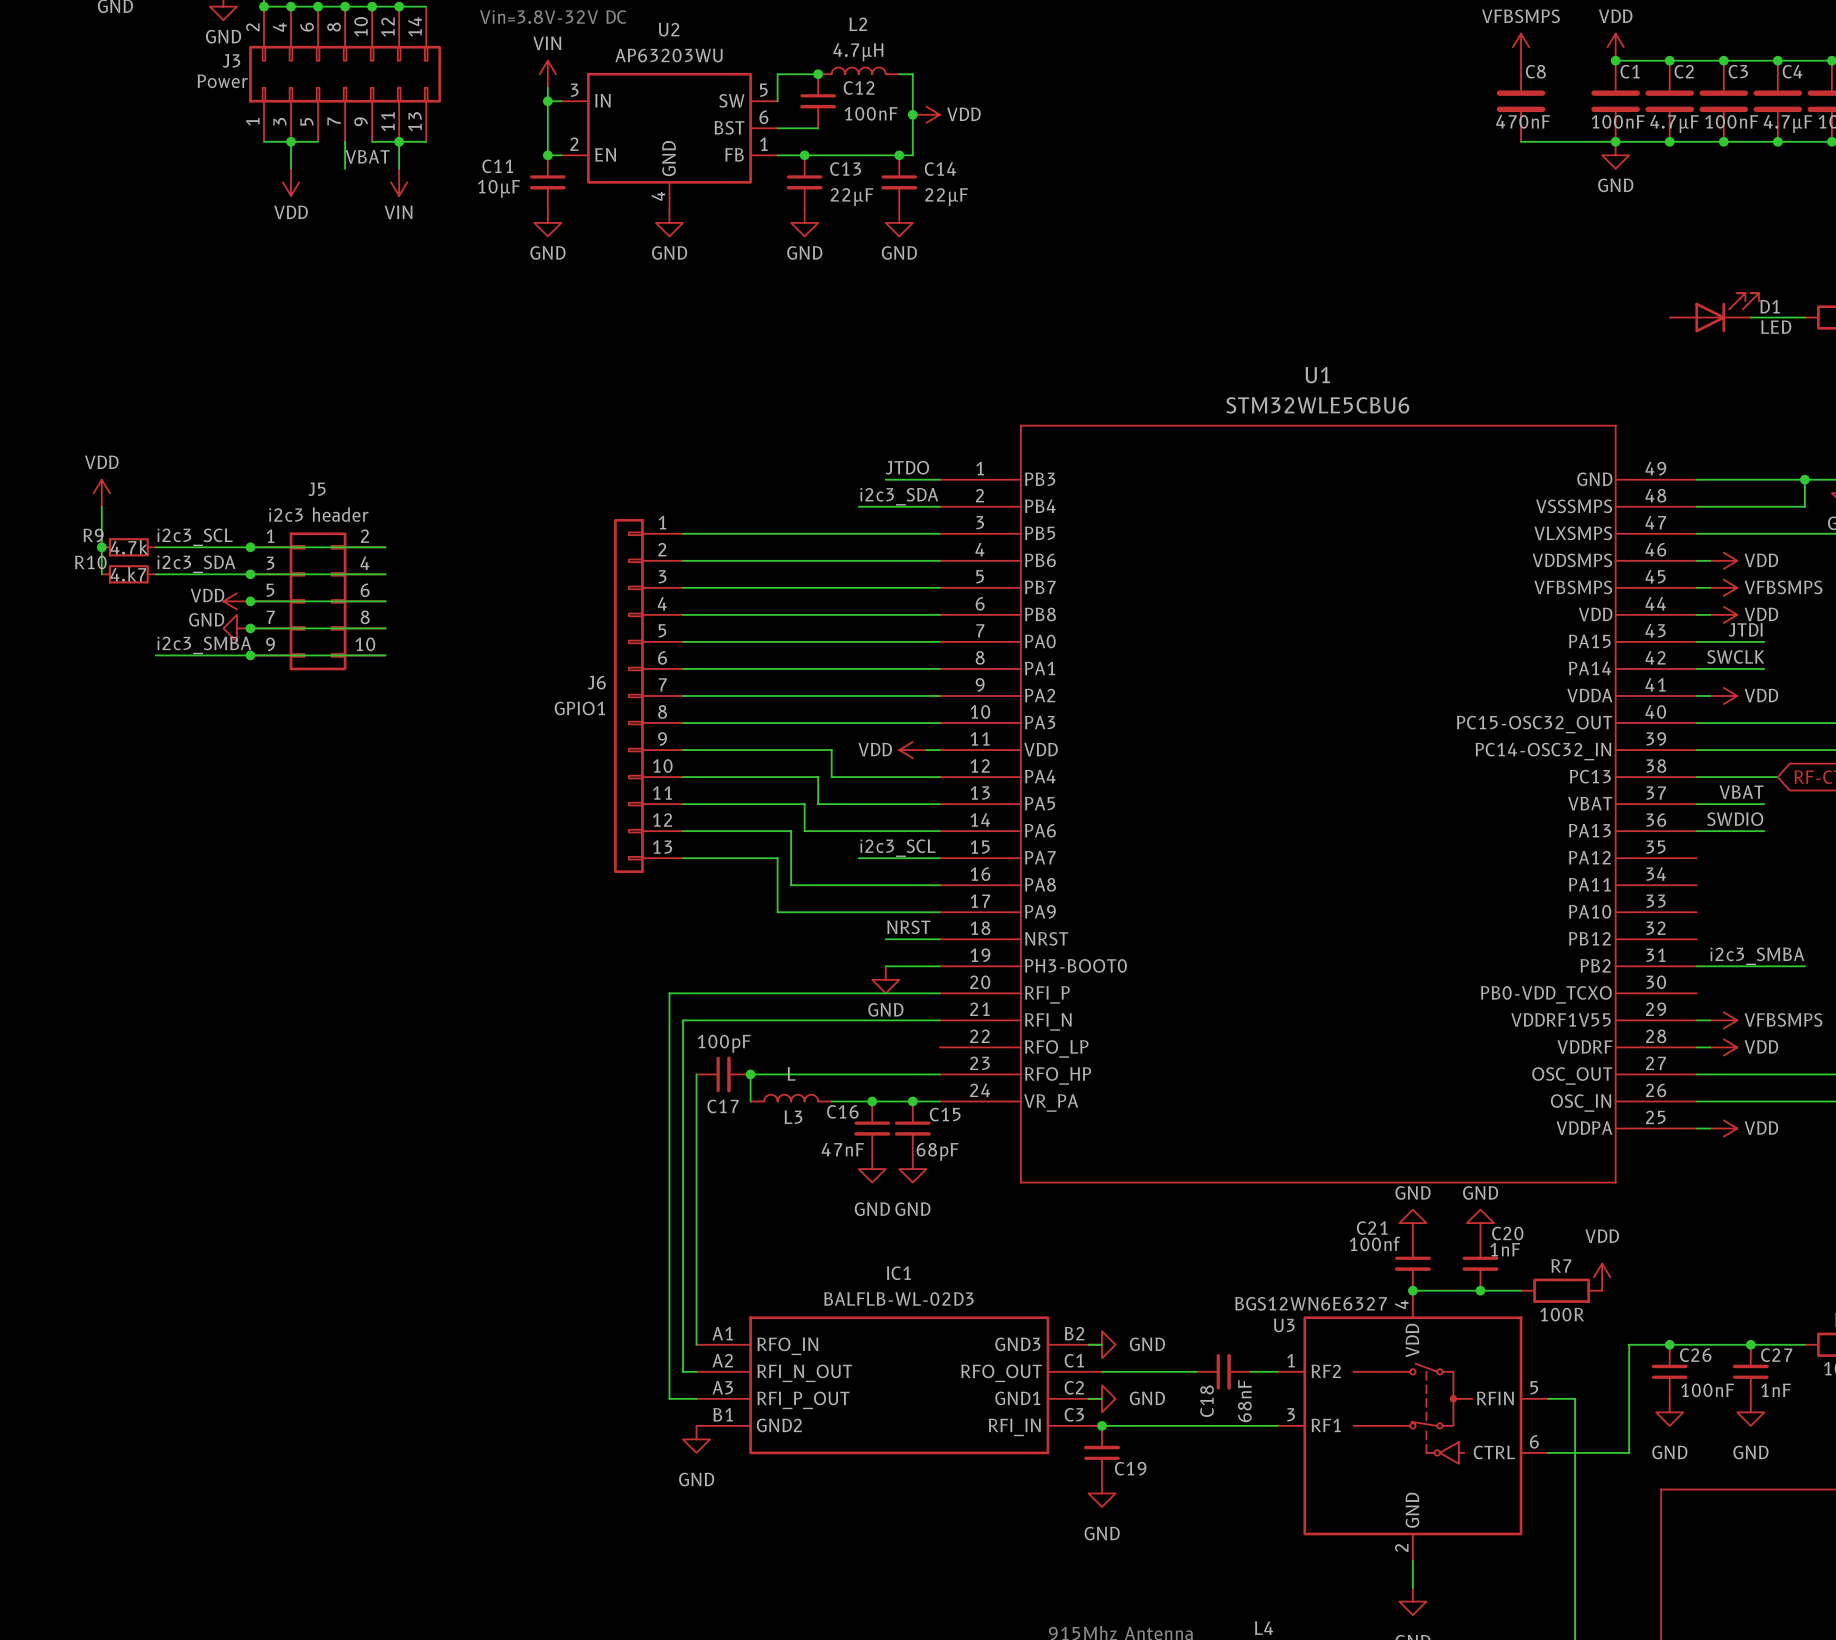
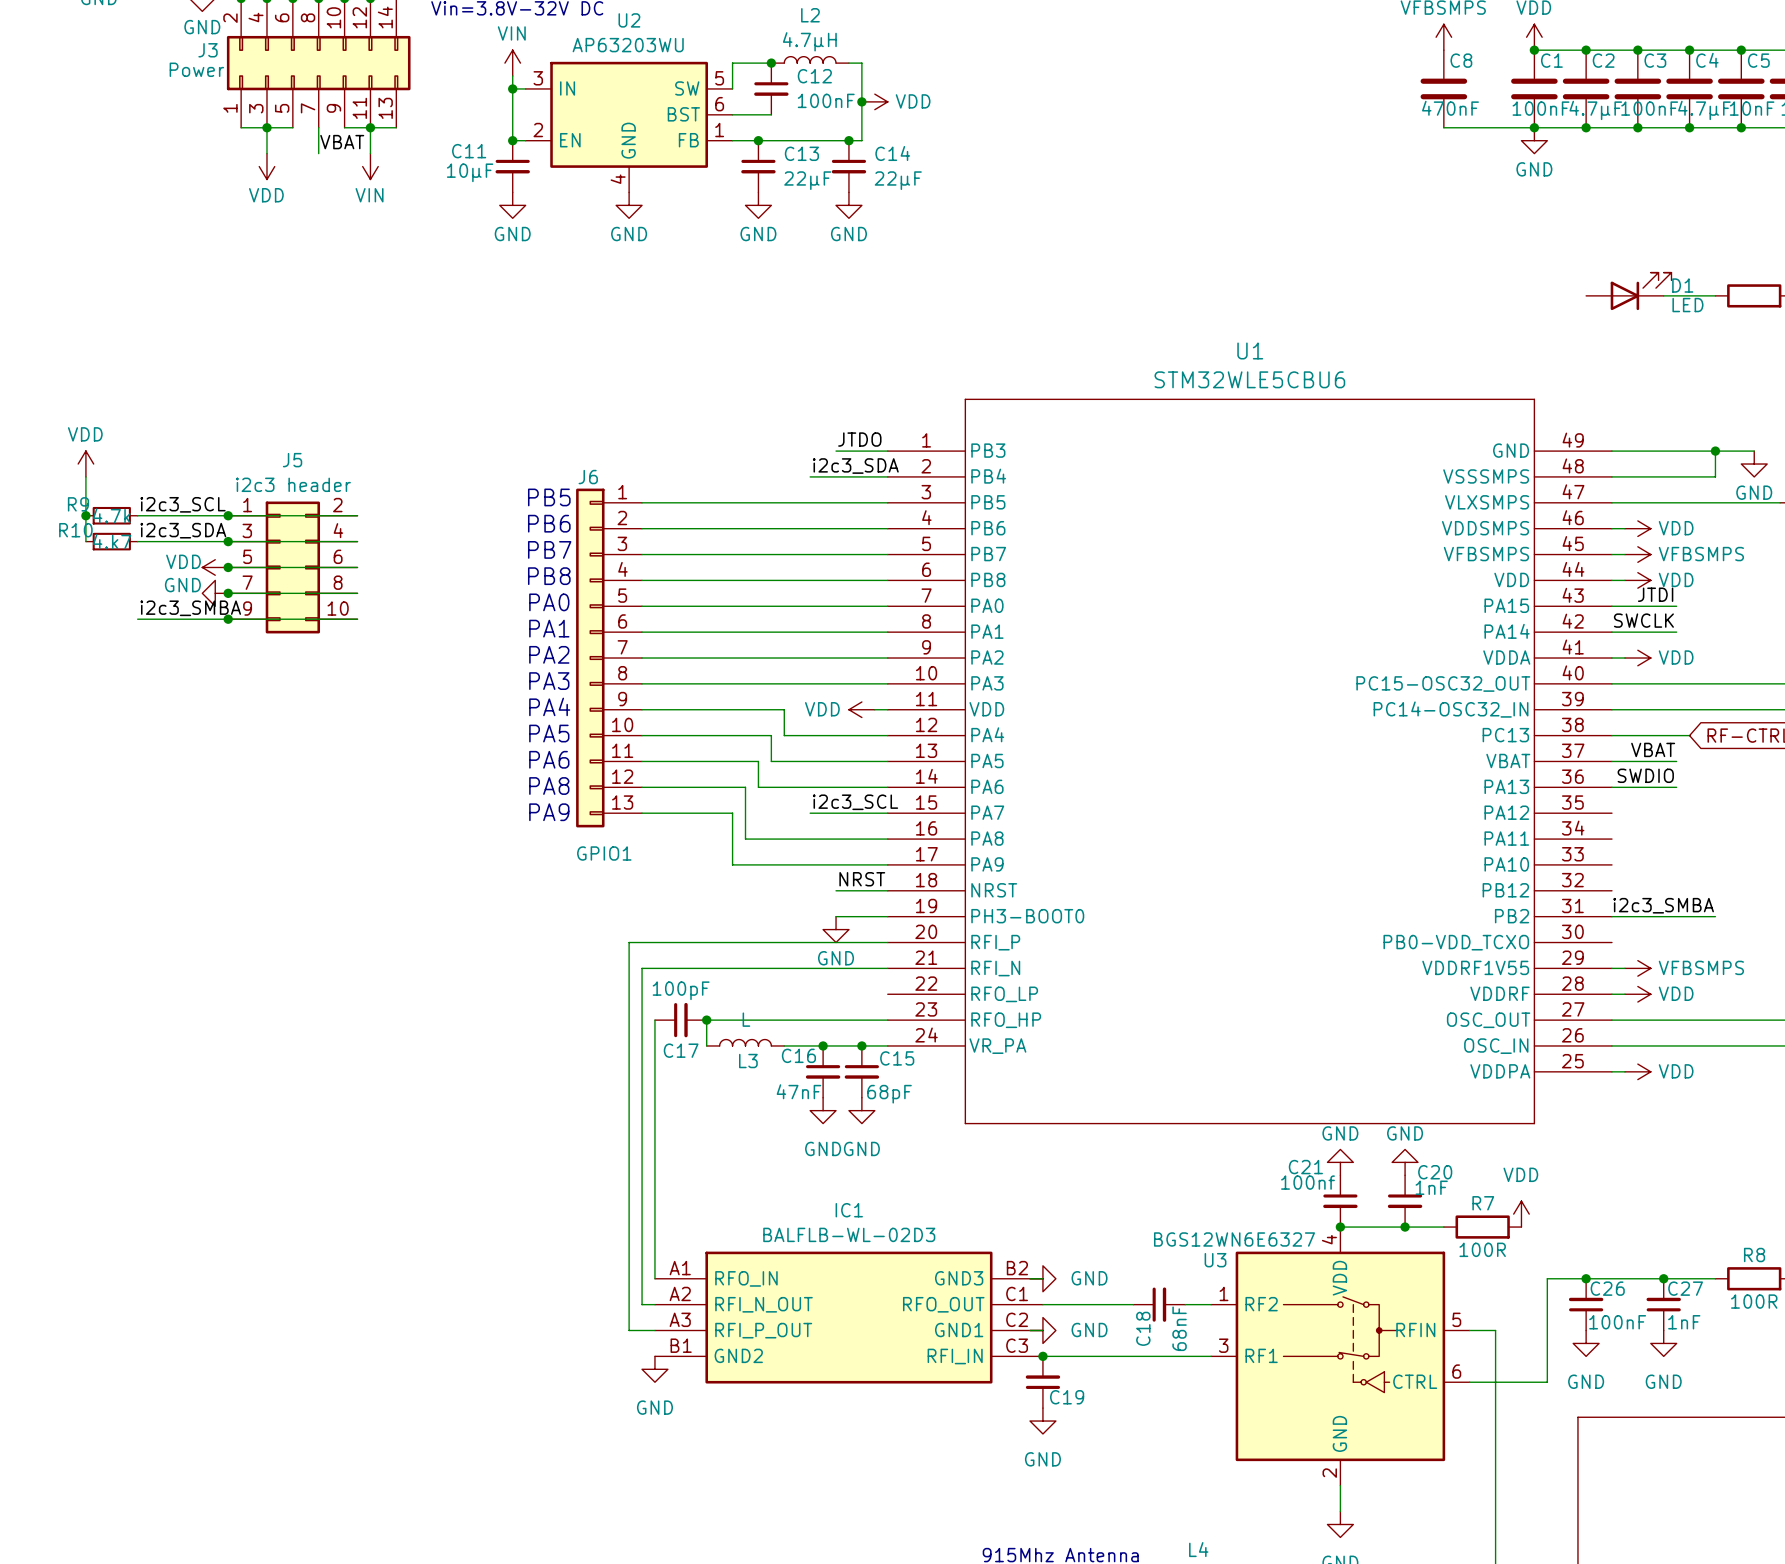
text: none -> PB5 (549, 497)
text: none -> PB6 (549, 523)
text: none -> PB7 (549, 549)
text: none -> PB8 (549, 576)
text: none -> PA0 (549, 602)
text: none -> PA1 (549, 628)
J6 name position: J6 (596, 682) -> J6 (588, 477)
text: none -> PA2 (549, 654)
J6 value position: GPIO1 (579, 708) -> GPIO1 (604, 853)
text: none -> PA3 (549, 681)
text: none -> PA4 (549, 706)
text: none -> PA5 (549, 733)
text: none -> PA6 (549, 759)
text: none -> PA8 (549, 786)
text: none -> PA9 (549, 812)

